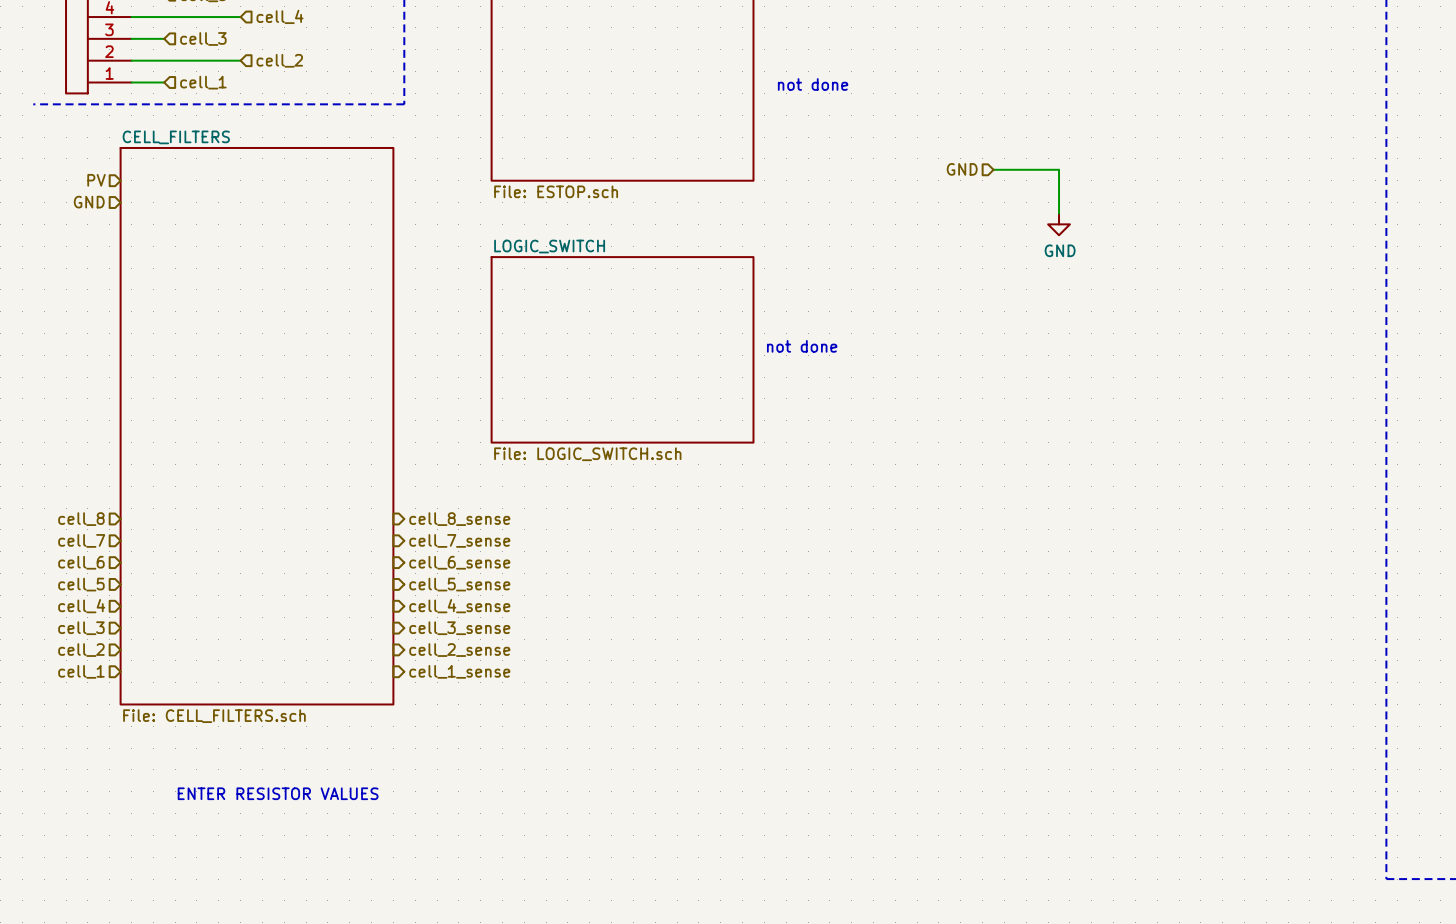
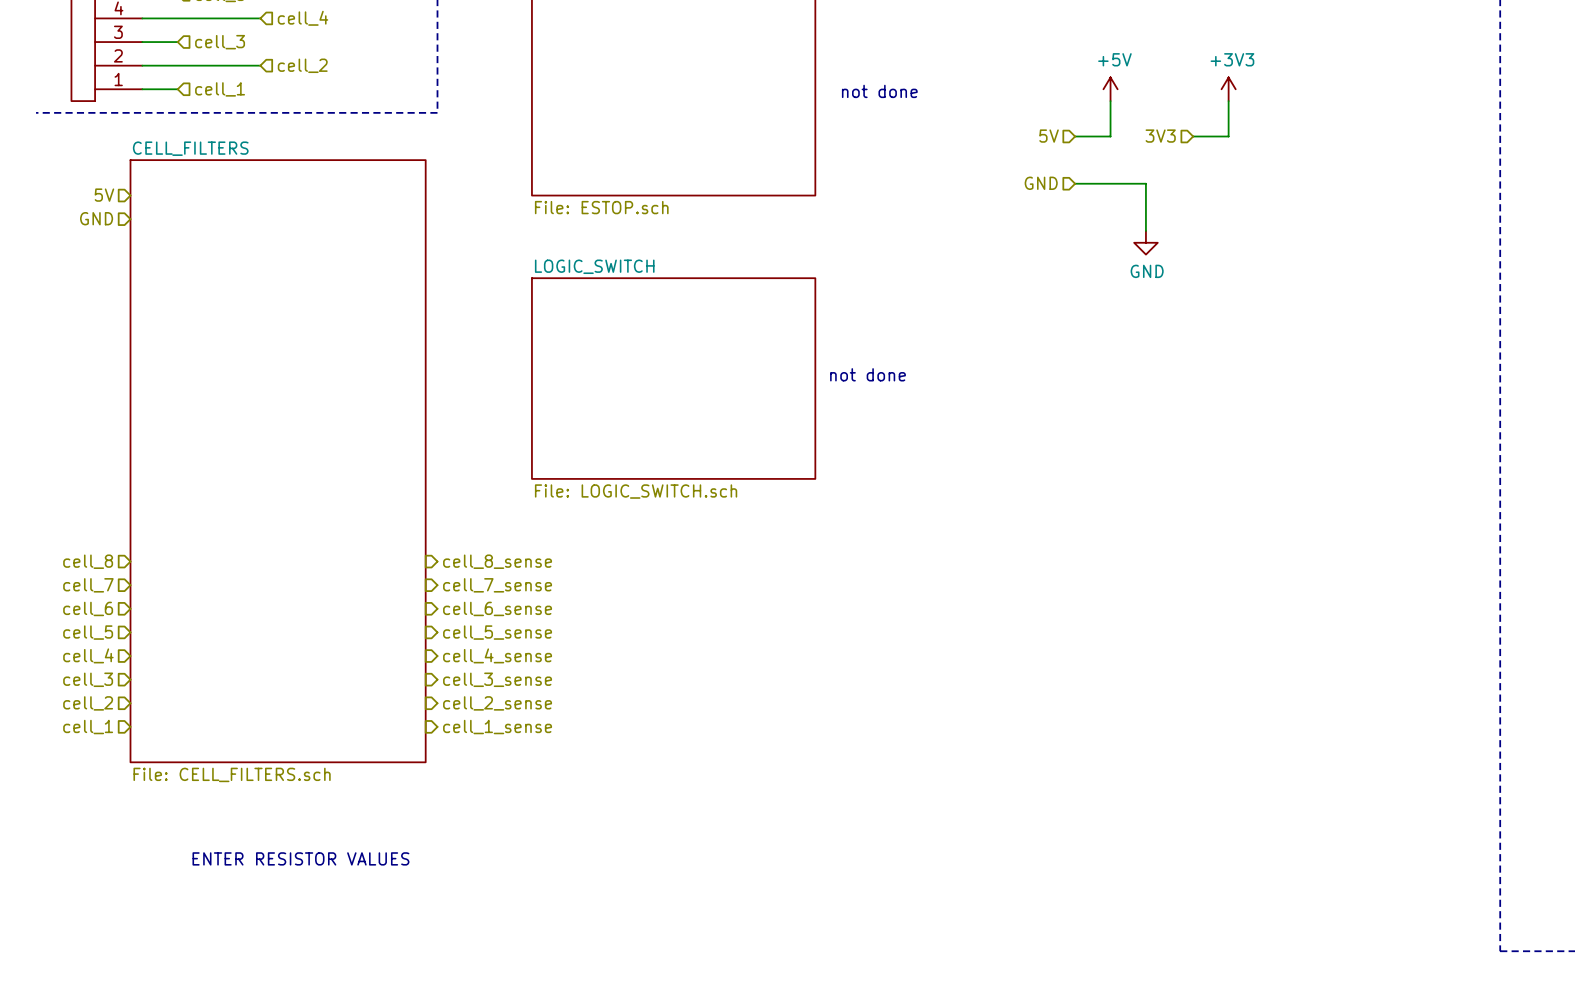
power symbol: none -> +5V (1110, 89)
power symbol: none -> +3V3 (1228, 89)
wire: none -> (1110, 101) (1110, 136) (1075, 136)
wire: none -> (1228, 101) (1228, 136) (1193, 136)
hierarchical label: none -> 5V (1049, 136)
hierarchical label: none -> 3V3 (1160, 136)
hierarchical label: PV (96, 180) -> 5V (104, 195)

